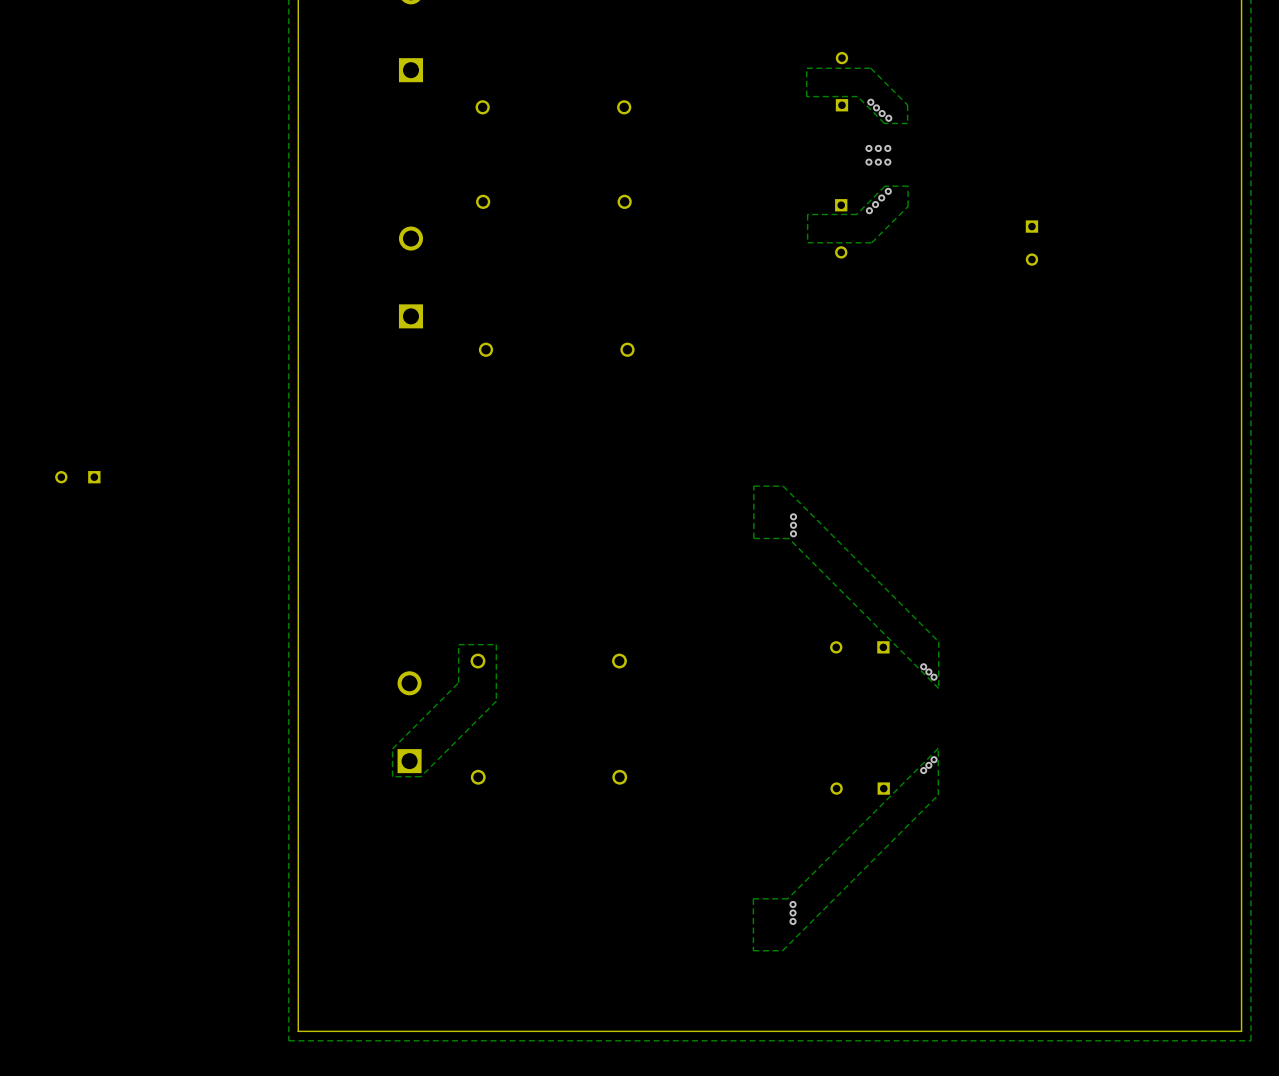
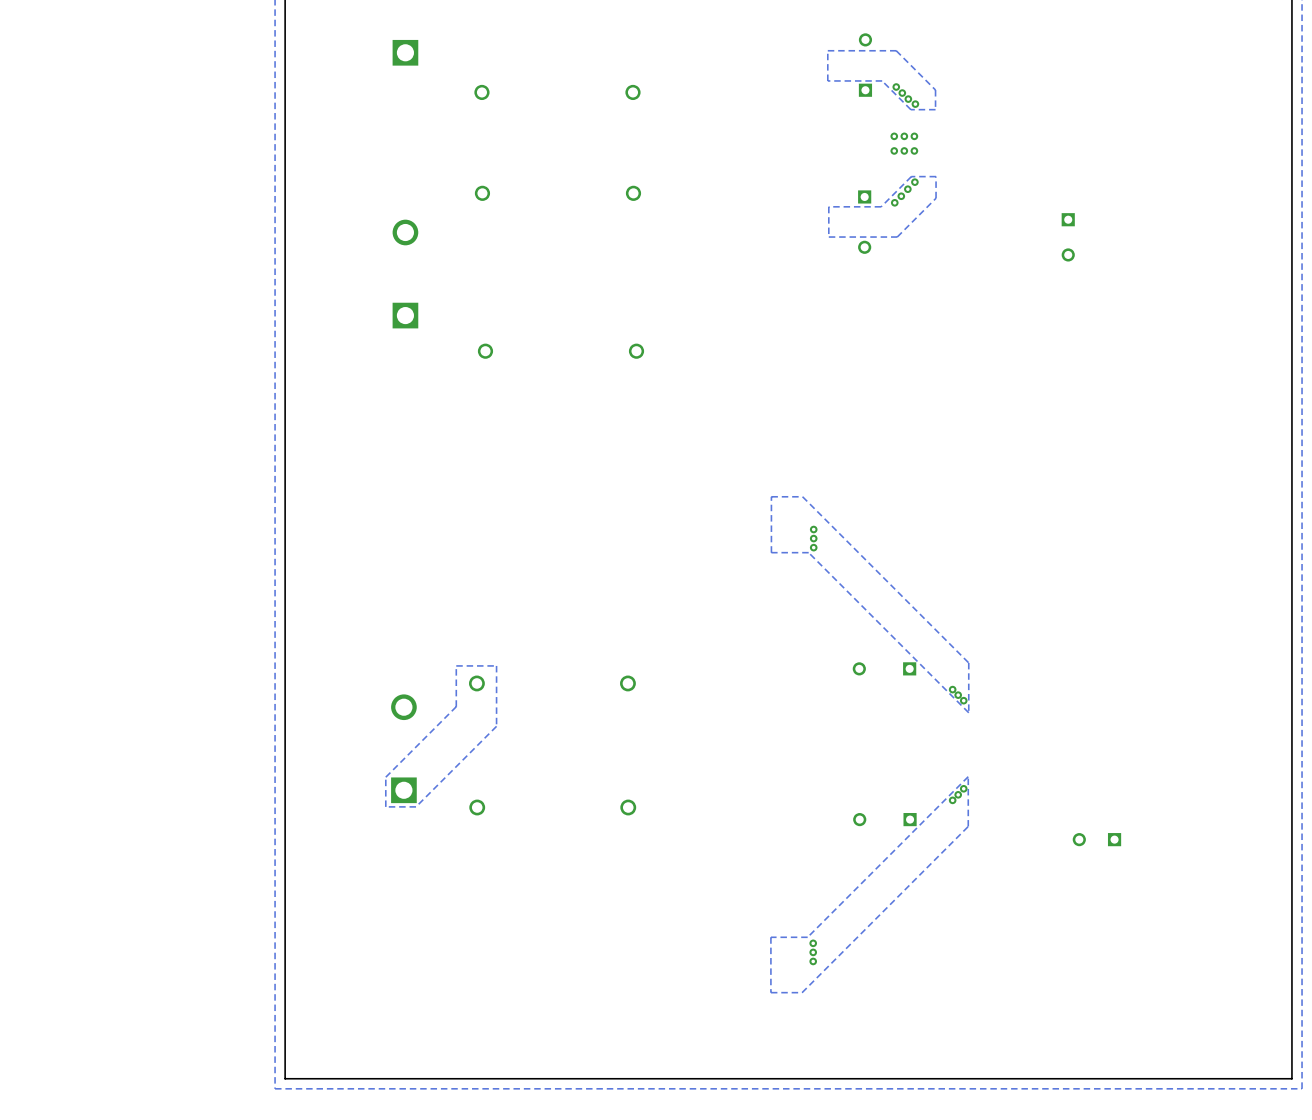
part: (77, 477) -> none
part: none -> (1096, 839)

